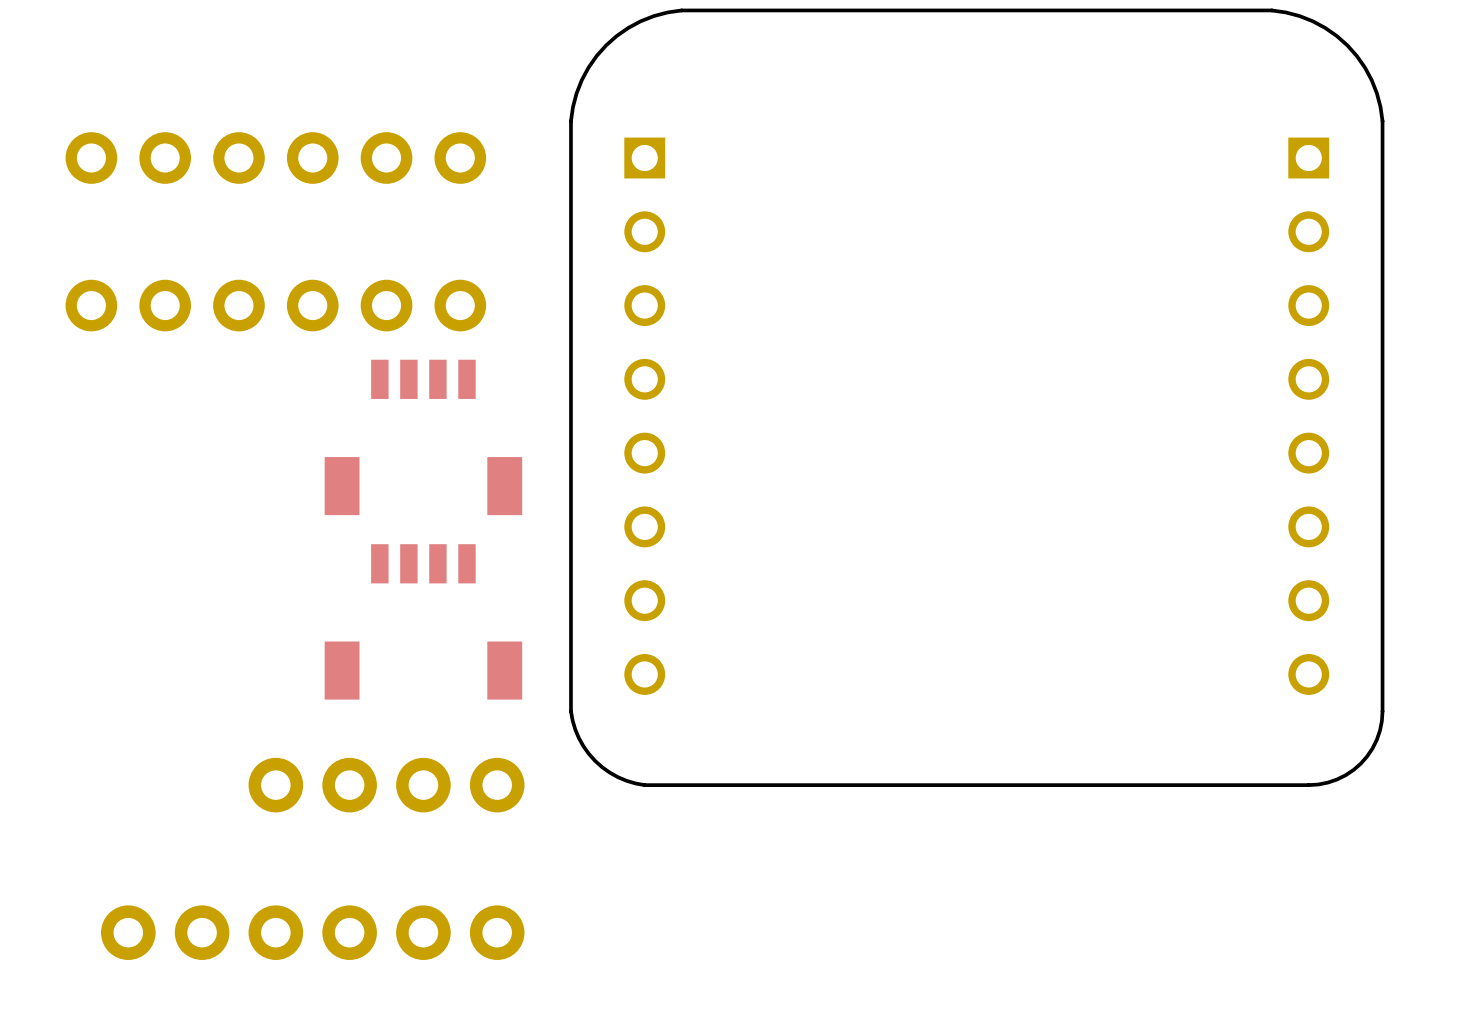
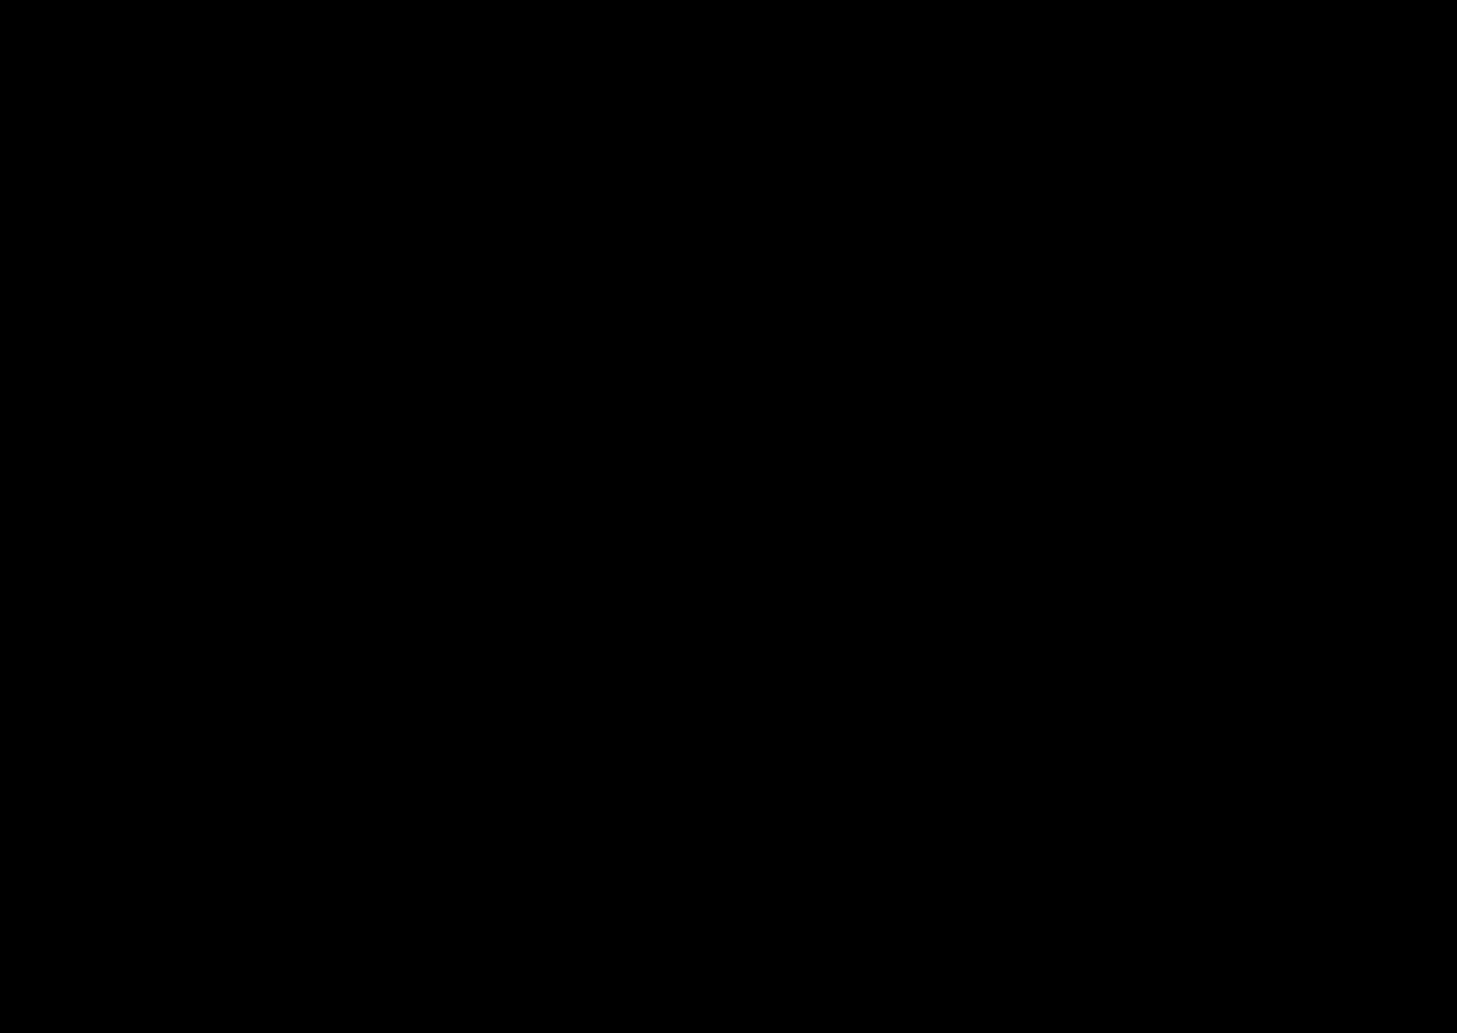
part: (275, 158) -> none
part: (275, 305) -> none
part: (976, 397) -> none
part: (423, 437) -> none
part: (423, 621) -> none
part: (386, 785) -> none
part: (312, 932) -> none

